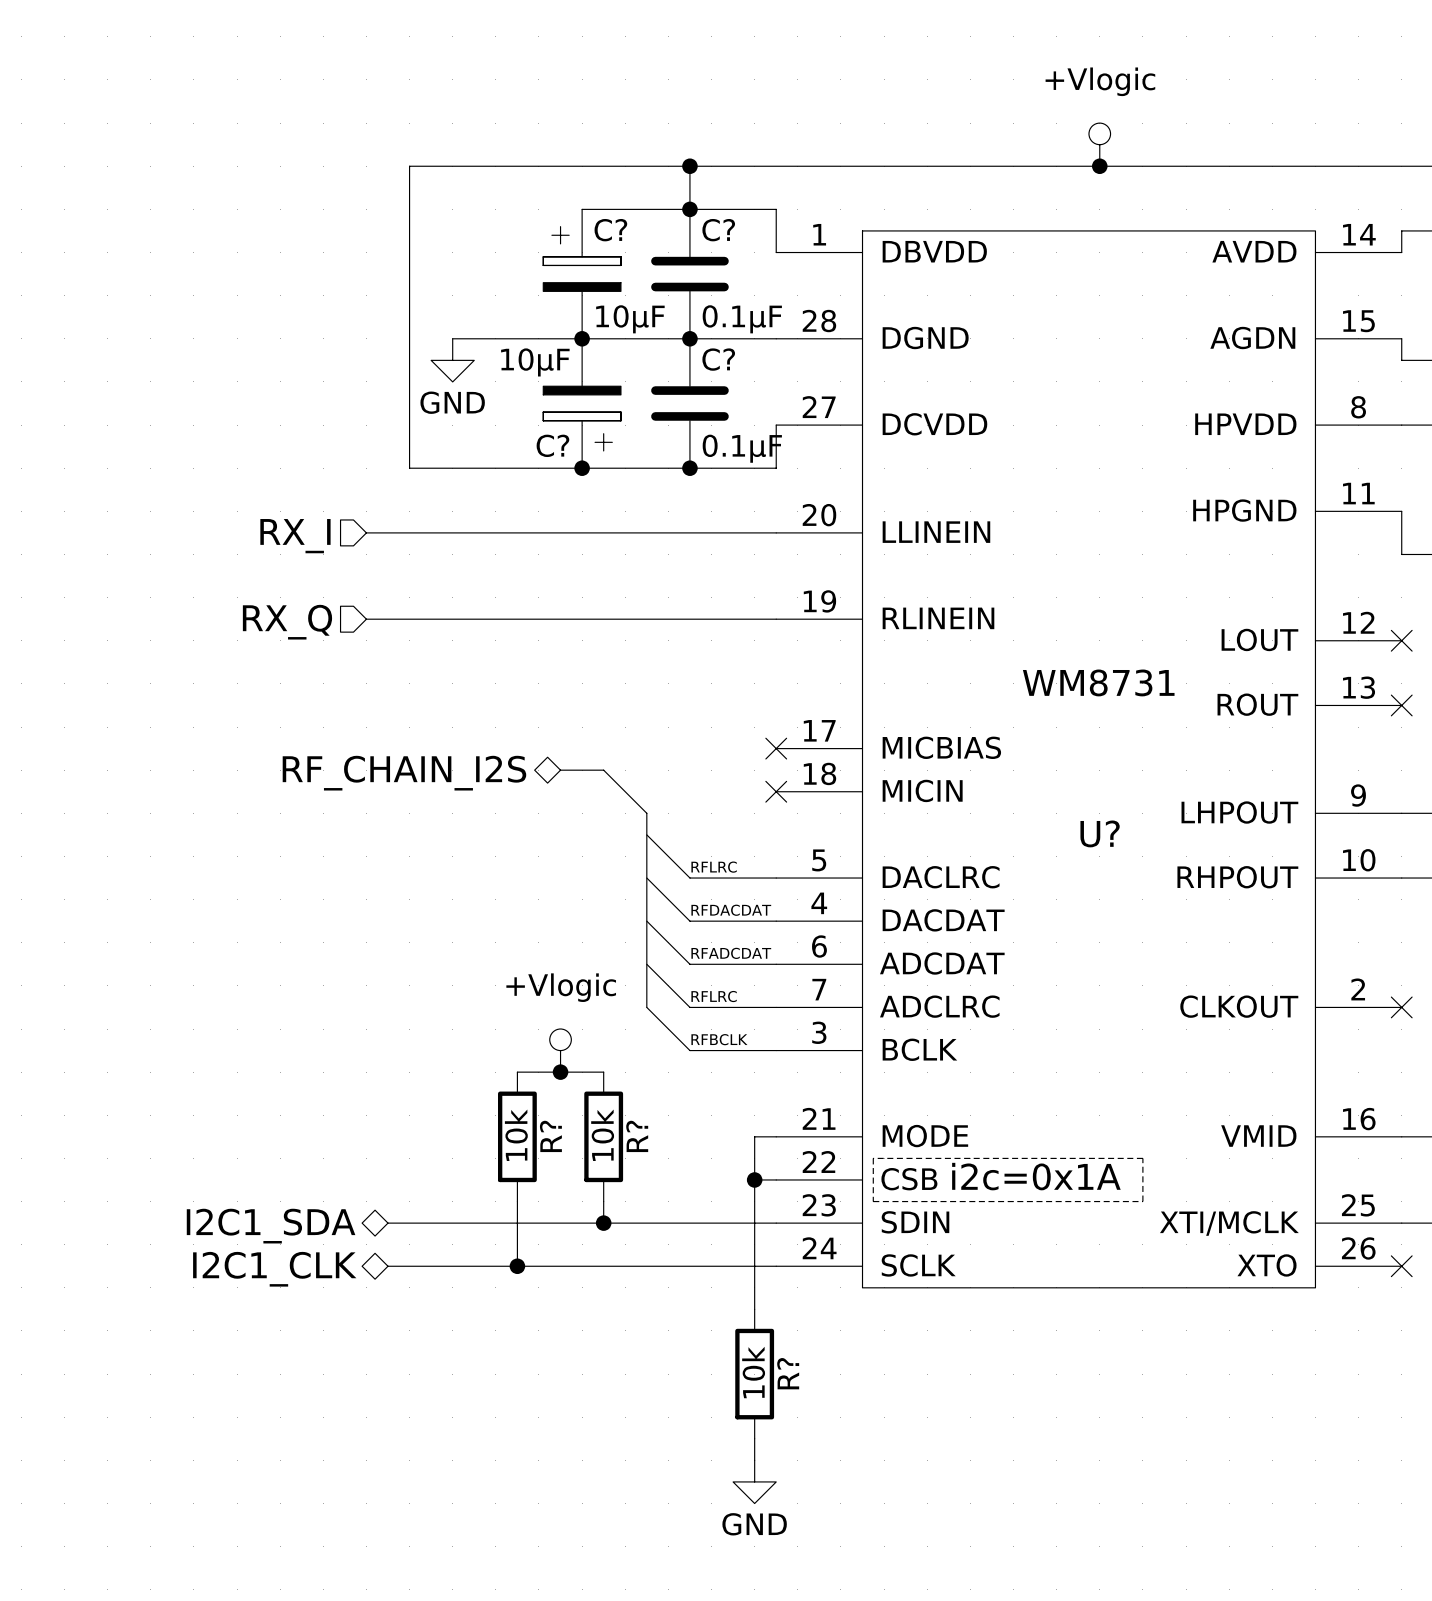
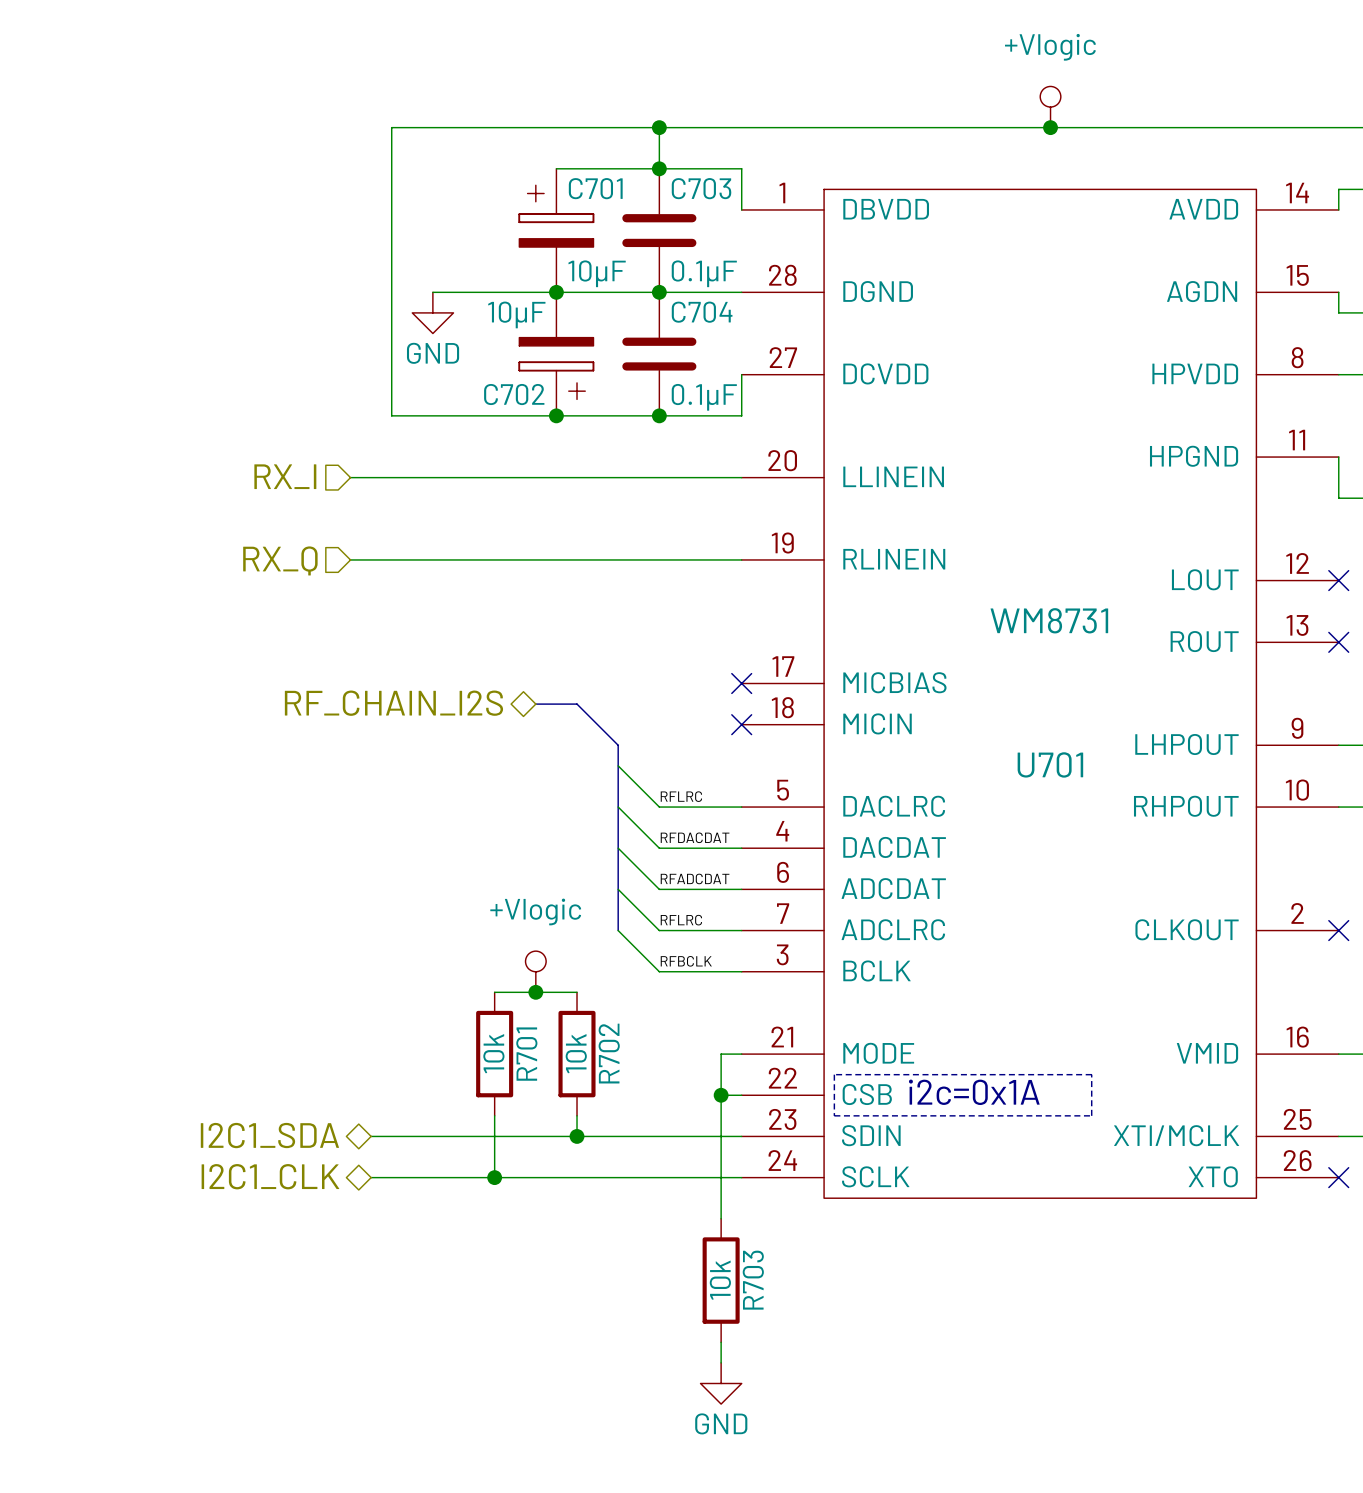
C? name: C? (610, 230) -> C701 (595, 188)
C? name: C? (718, 230) -> C703 (701, 188)
C? name: C? (718, 359) -> C704 (702, 312)
C? name: C? (552, 445) -> C702 (514, 394)
U? name: U? (1100, 833) -> U701 (1050, 764)
R? name: R? (550, 1136) -> R701 (526, 1054)
R? name: R? (637, 1136) -> R702 (609, 1053)
R? name: R? (788, 1373) -> R703 (753, 1280)

